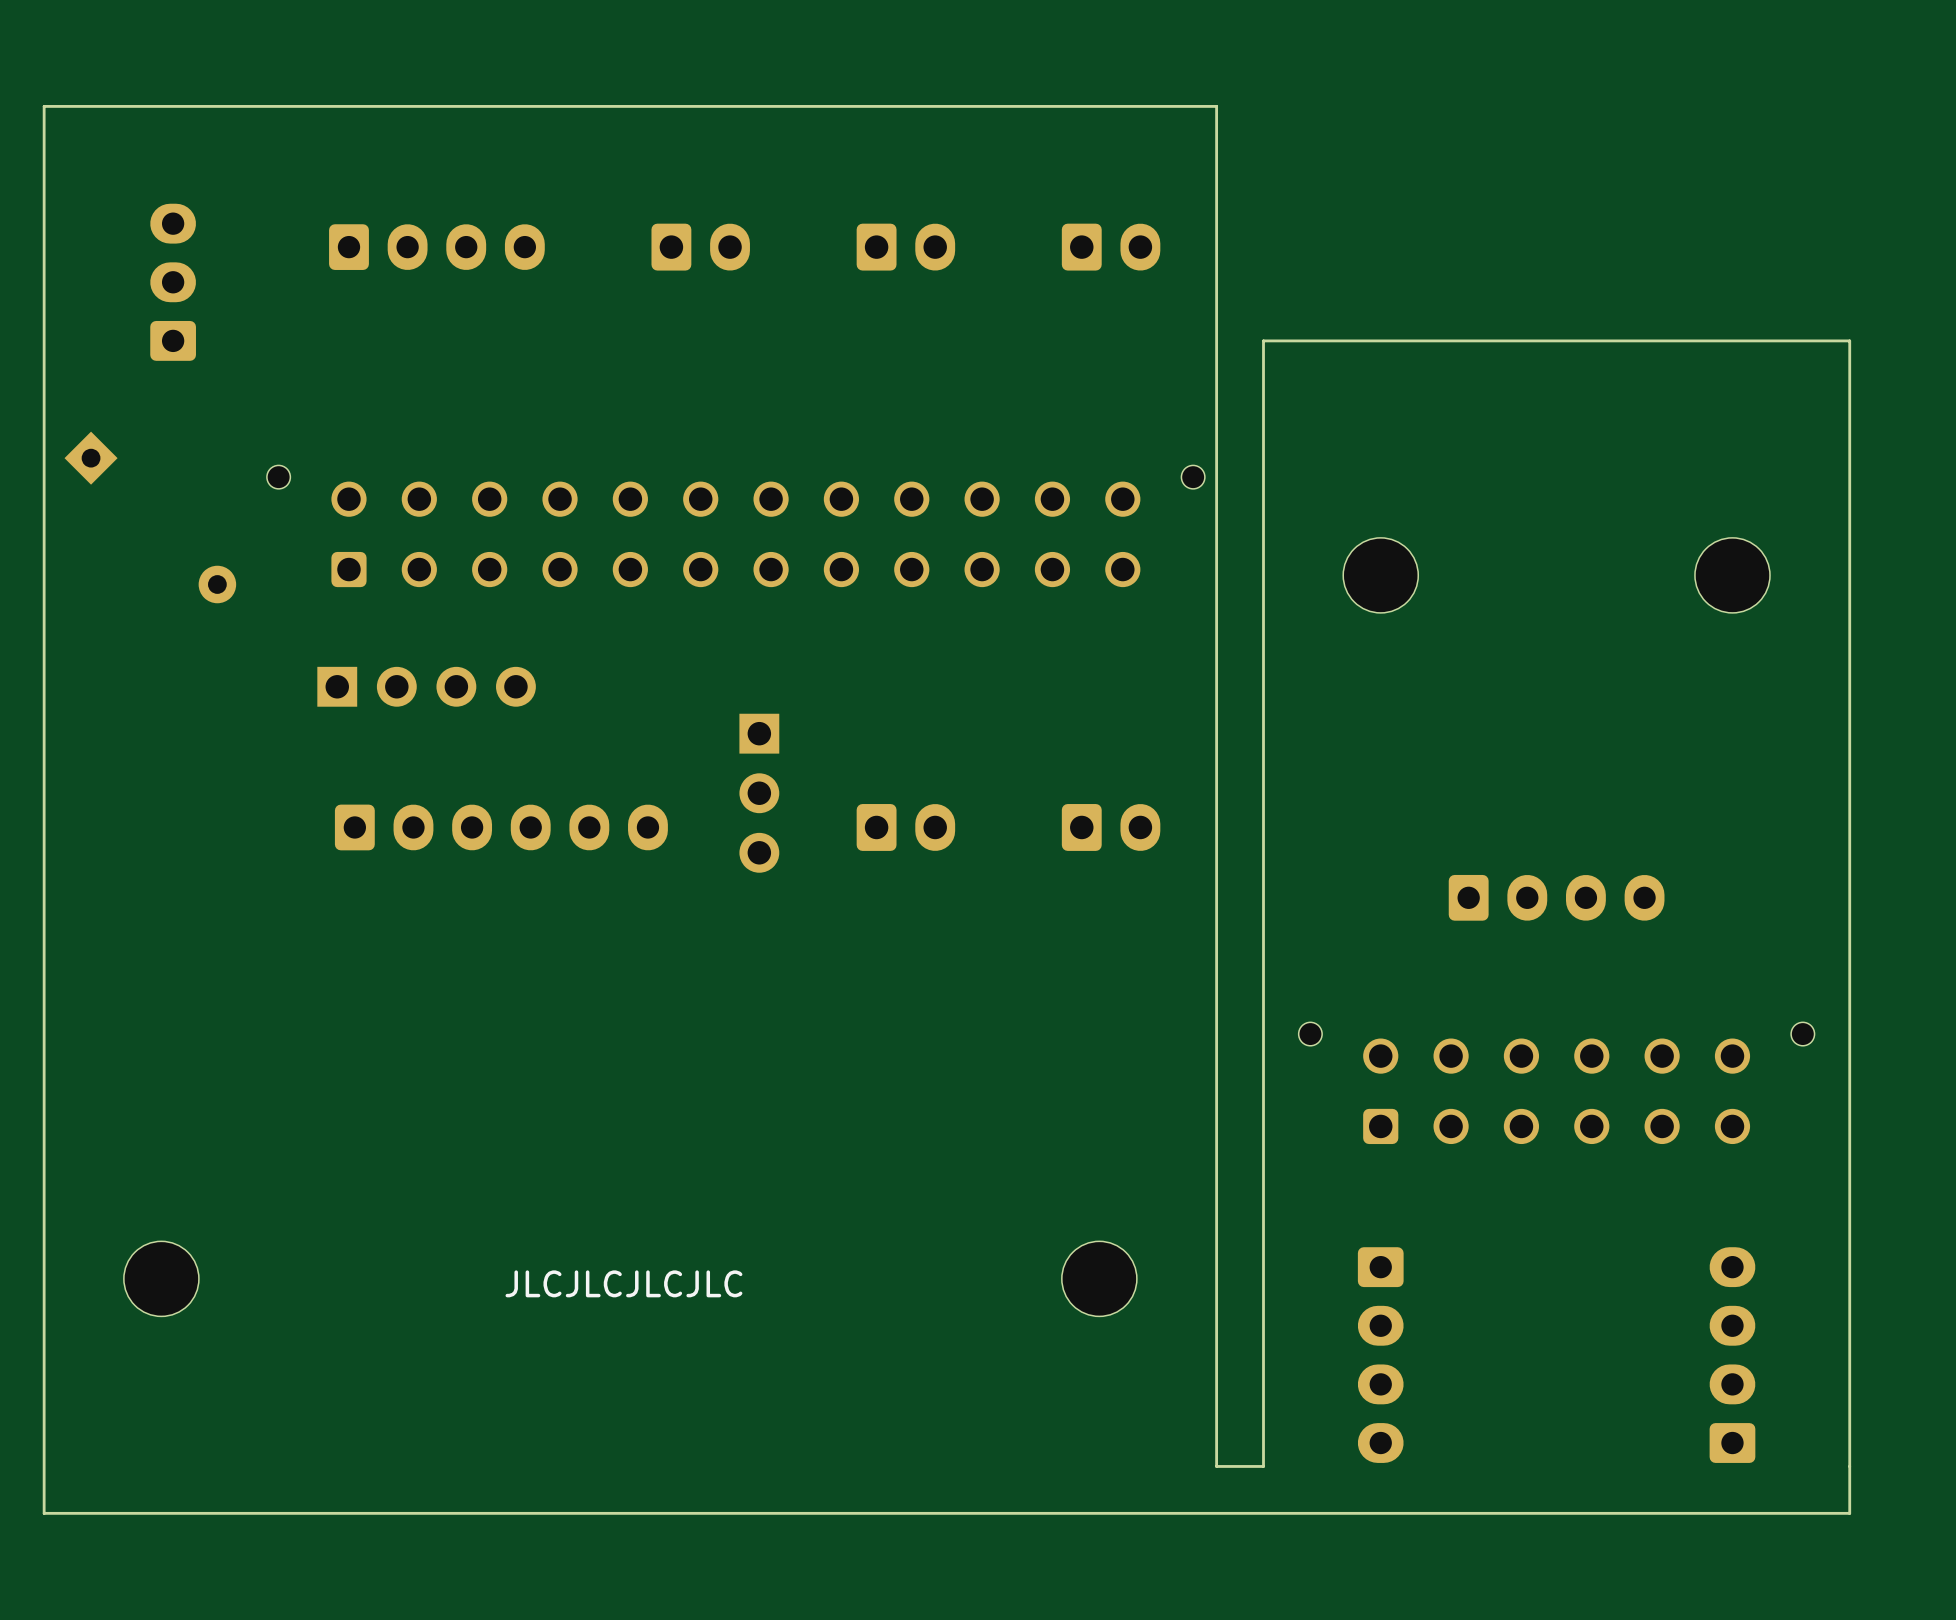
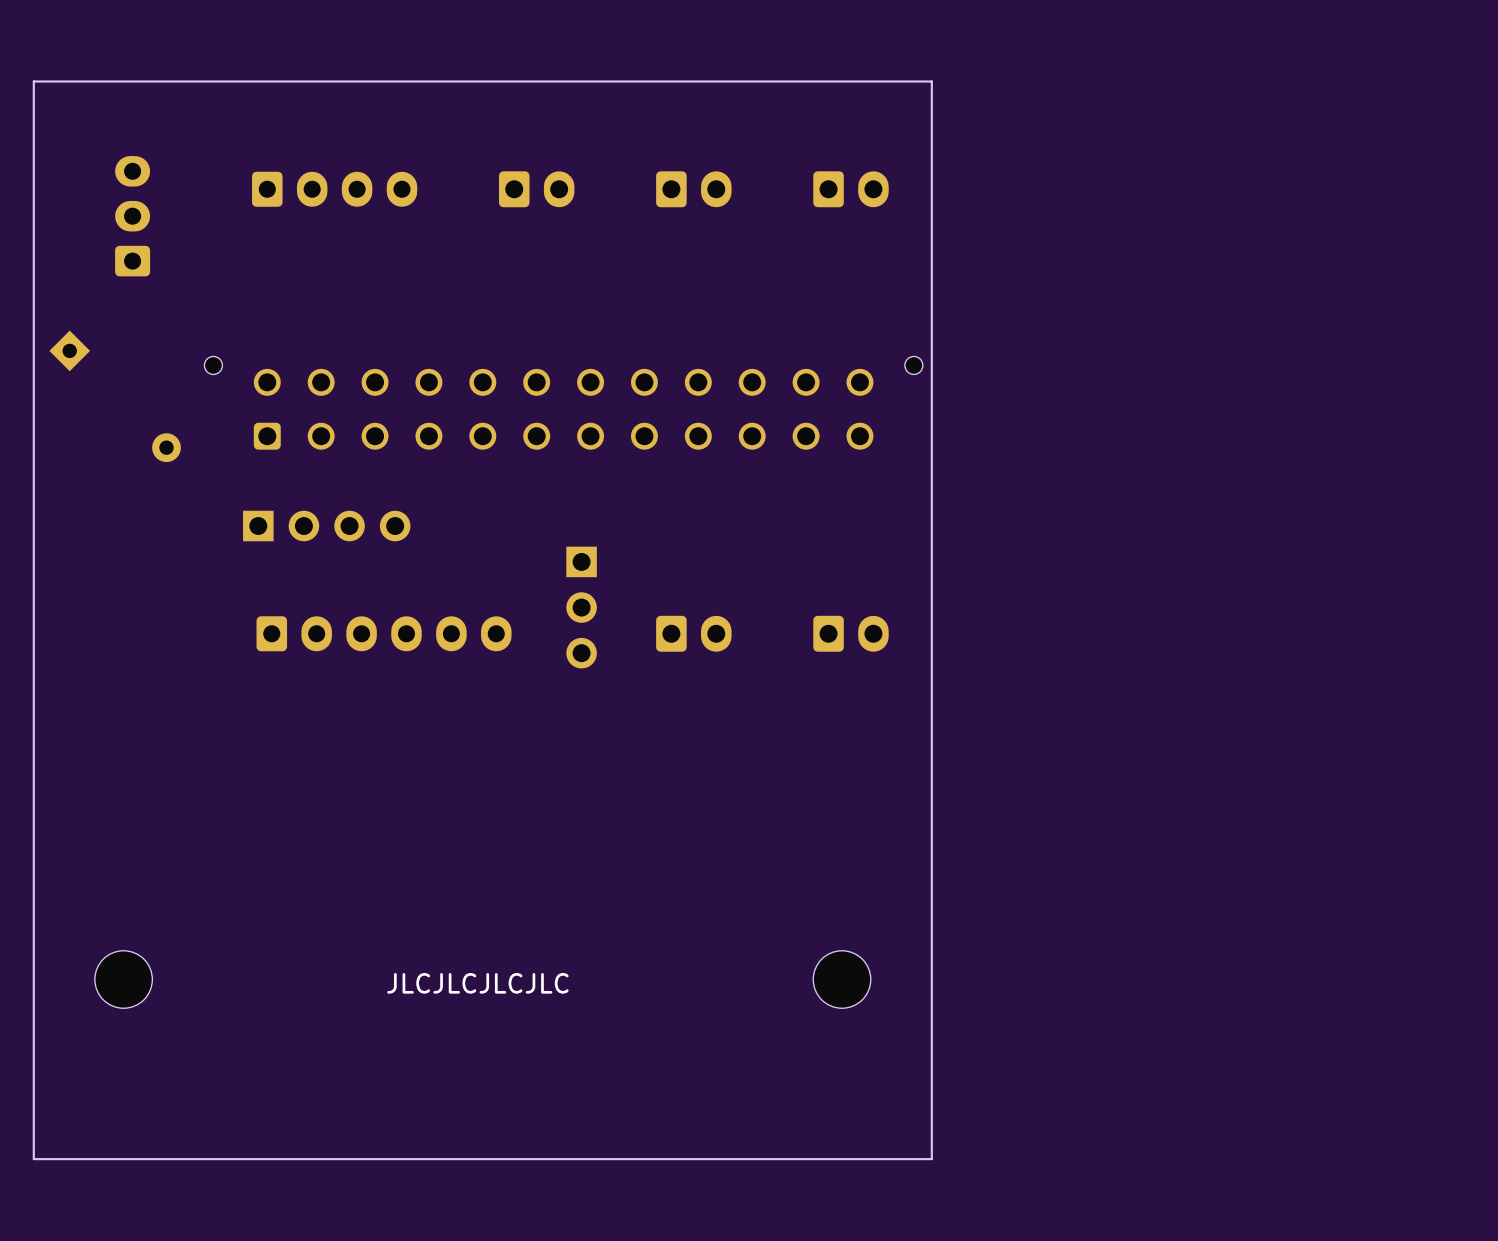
part: (1380, 575) -> none
part: (1732, 575) -> none
part: (1556, 897) -> none
part: (1556, 1083) -> none
part: (1380, 1355) -> none
part: (1732, 1355) -> none
board edge: (1216, 1466) (1263, 1466) (1263, 340) (1849, 340) (1849, 1513) (1216, 1513) -> (931, 1123) (931, 1159)

